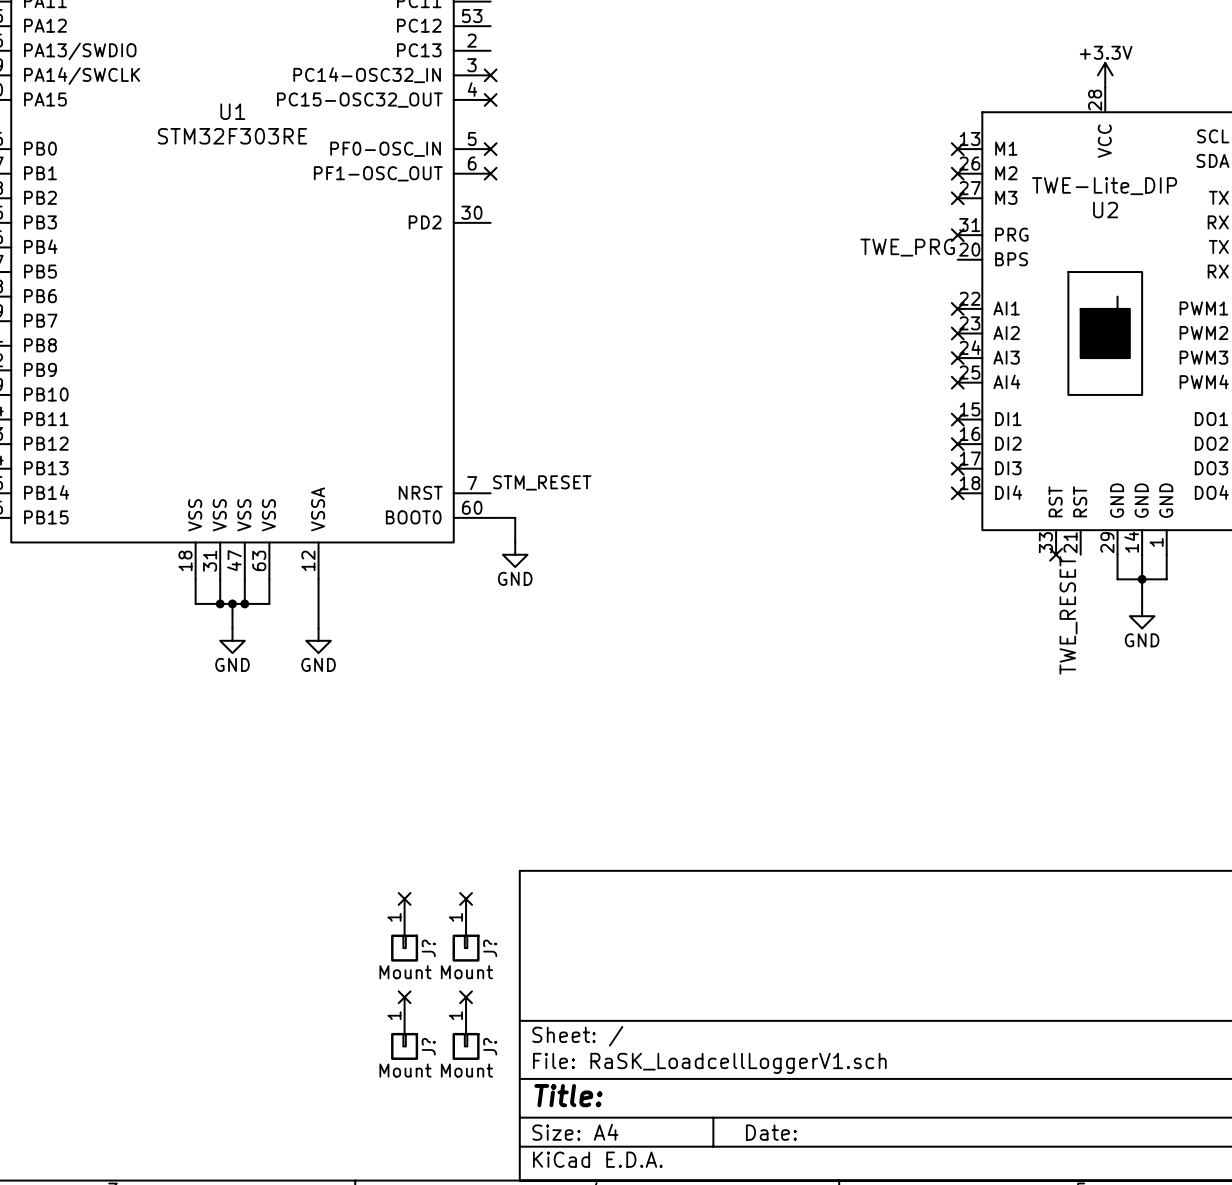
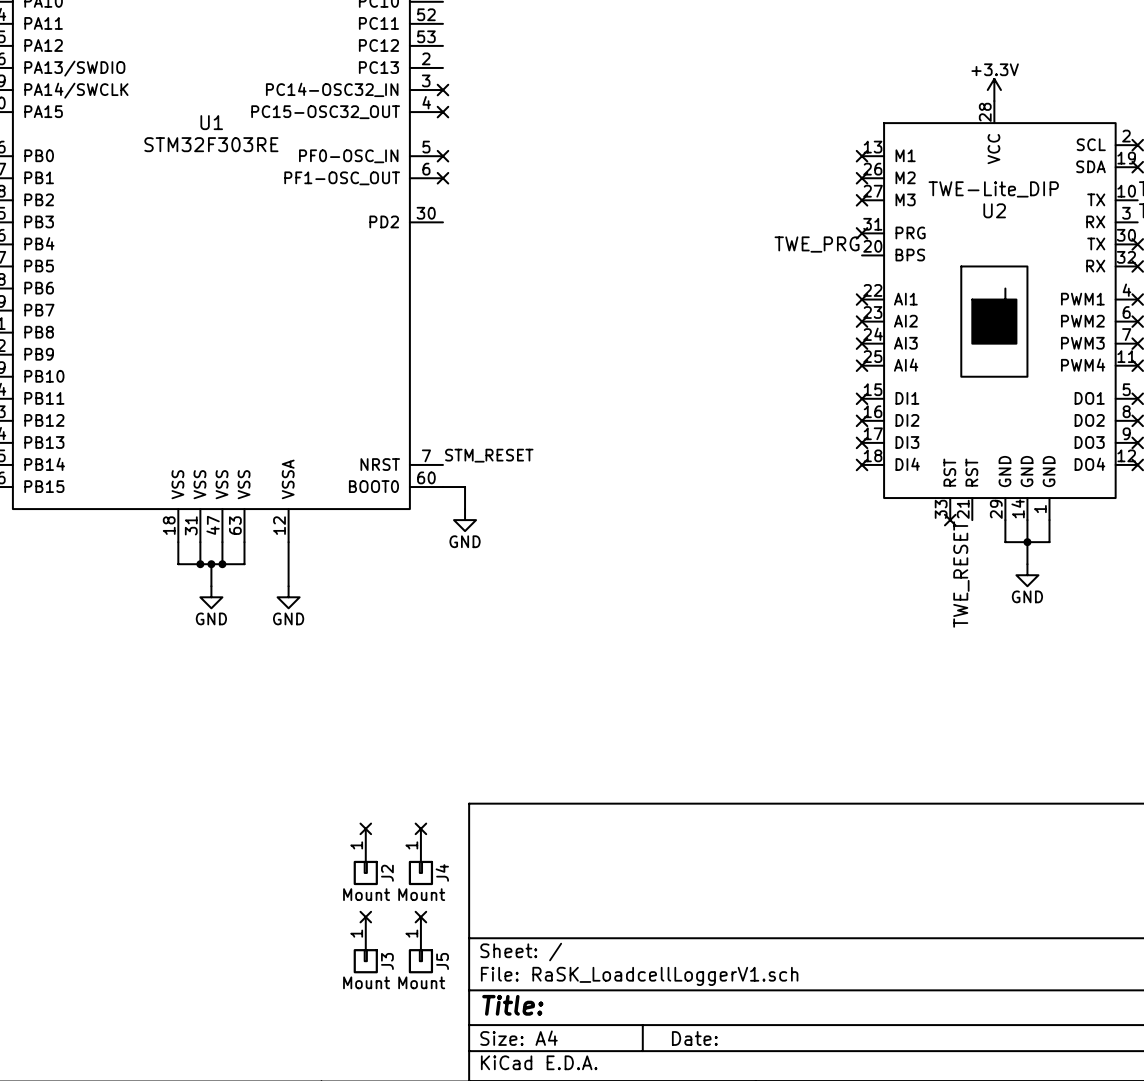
J? name: J? (428, 948) -> J2 (387, 873)
J? name: J? (490, 948) -> J4 (442, 872)
J? name: J? (428, 1046) -> J3 (387, 961)
J? name: J? (490, 1046) -> J5 (442, 961)

